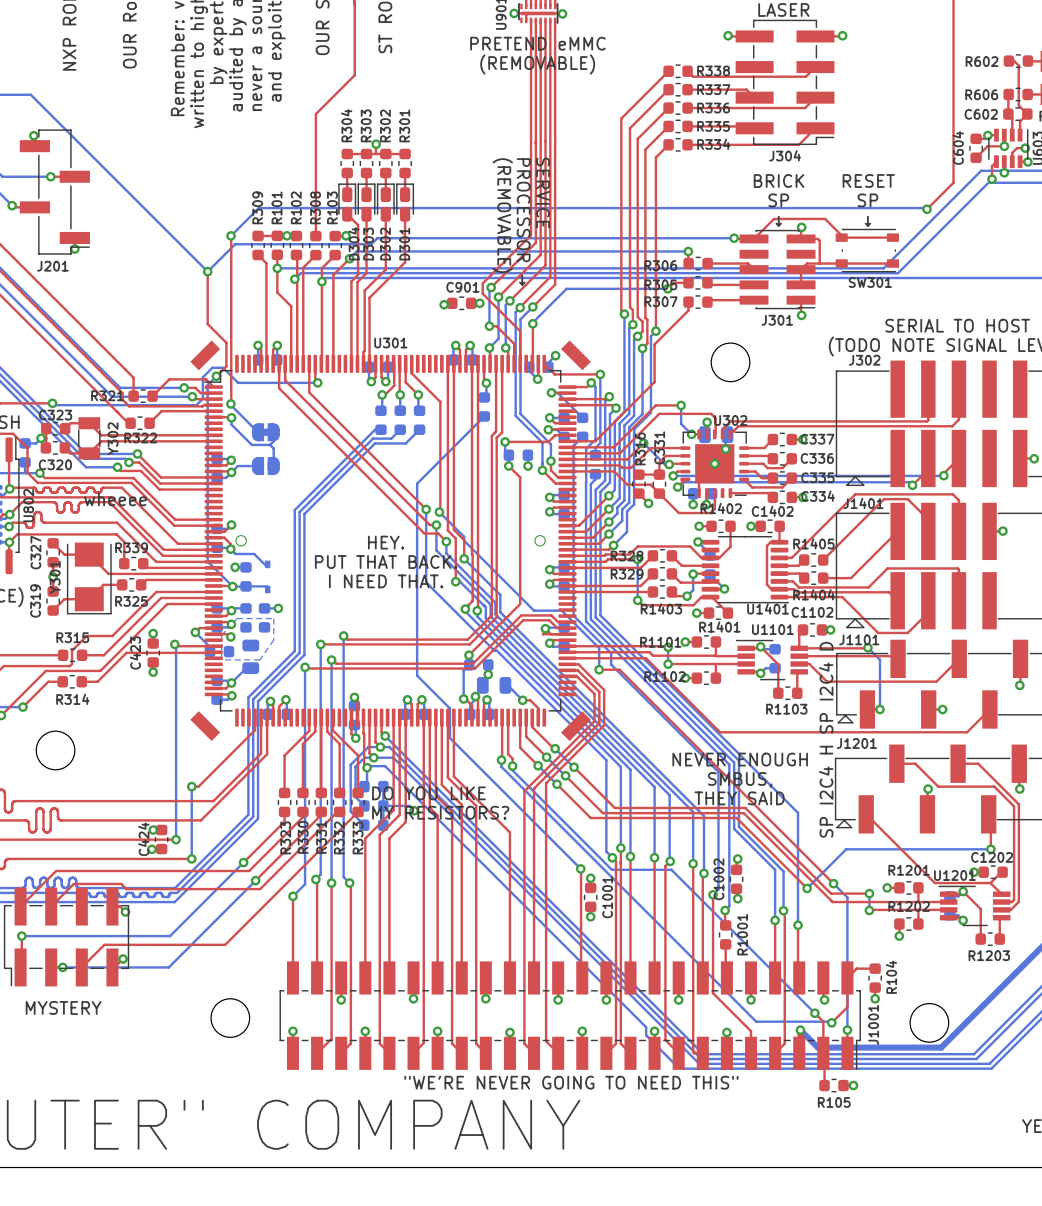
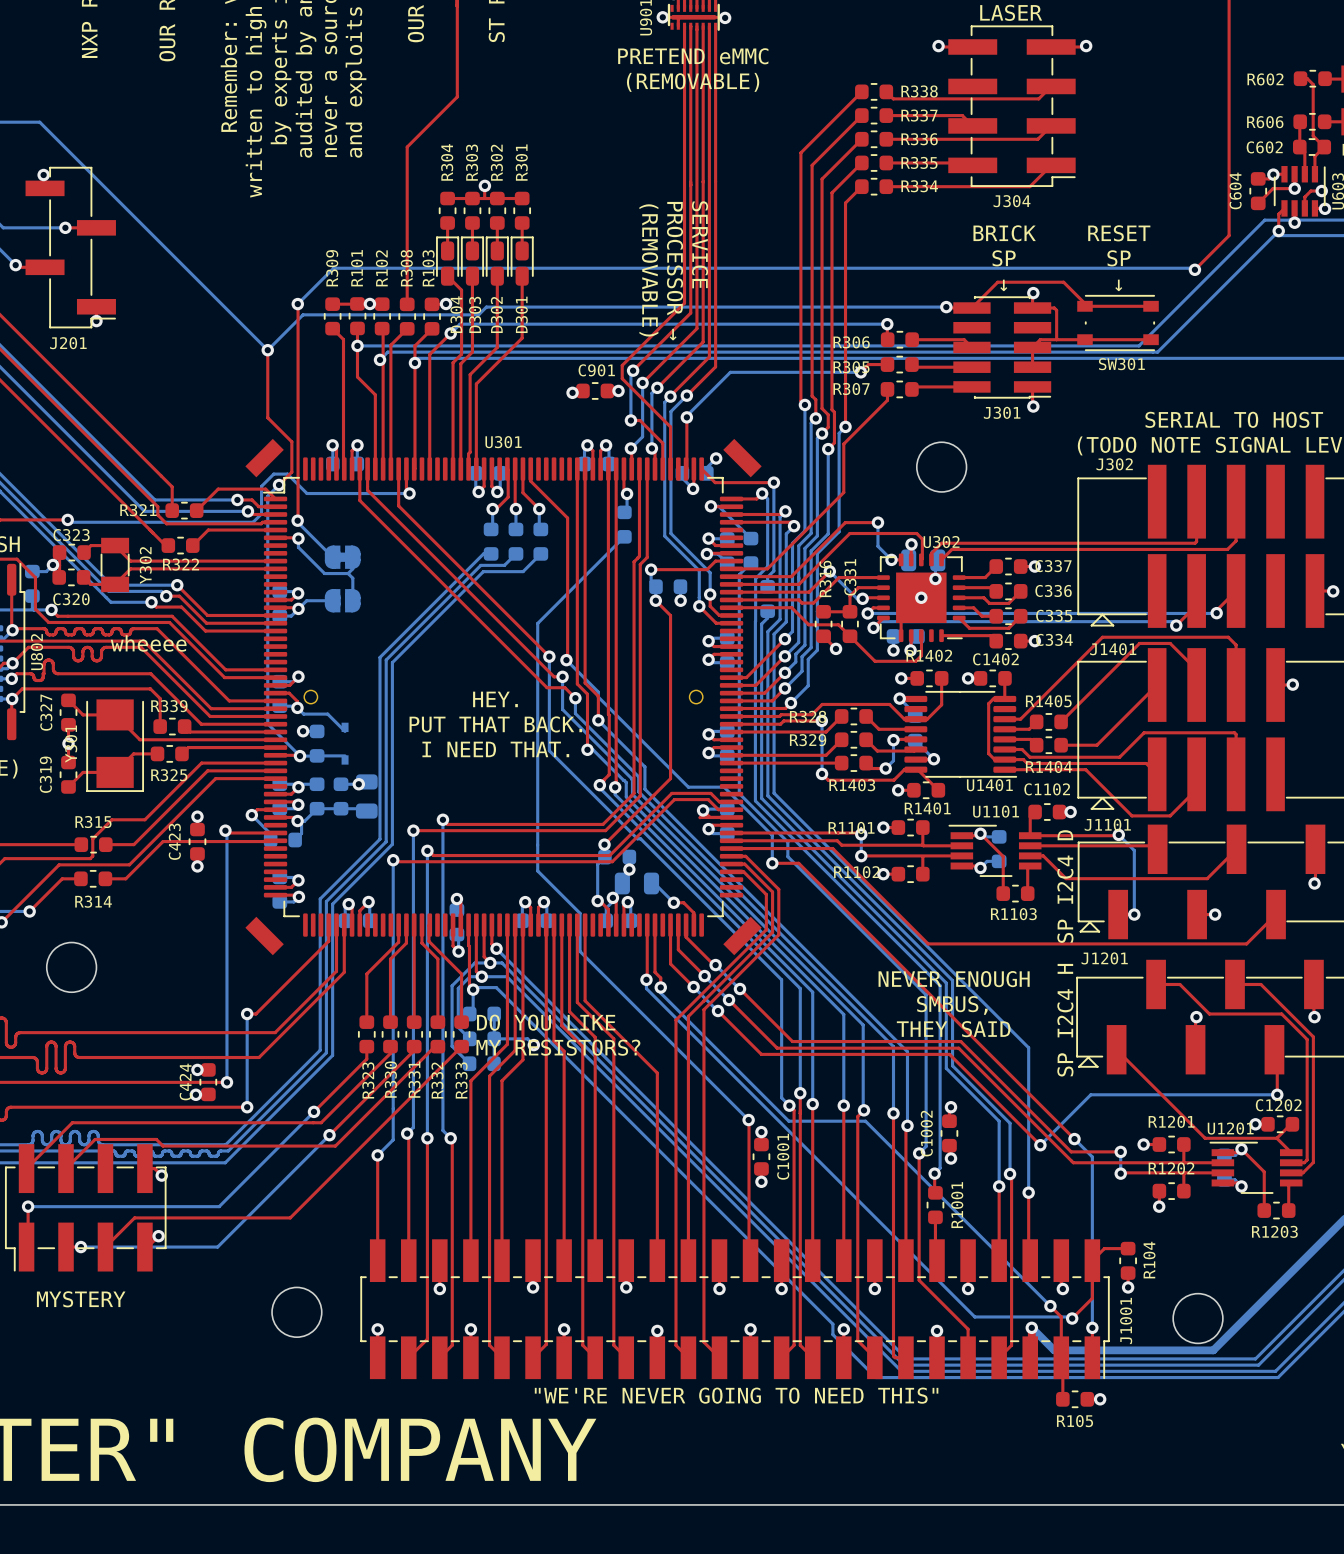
bottom zone outline: (237, 618) (221, 635) (221, 659) (259, 659) (273, 639) (273, 618) (237, 618) -> none
bottom track: none -> (366, 808) (317, 808) (304, 821) (301, 821) (301, 833) (295, 839)
part position: (250, 656) -> (366, 796)
bottom track: (250, 668) (246, 668) (231, 682) -> none

